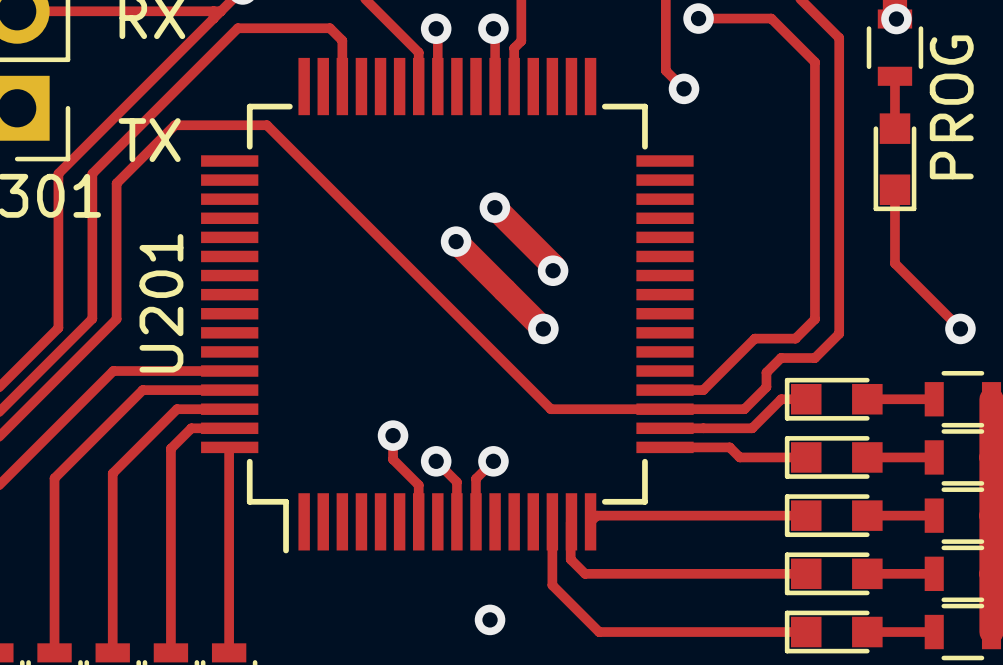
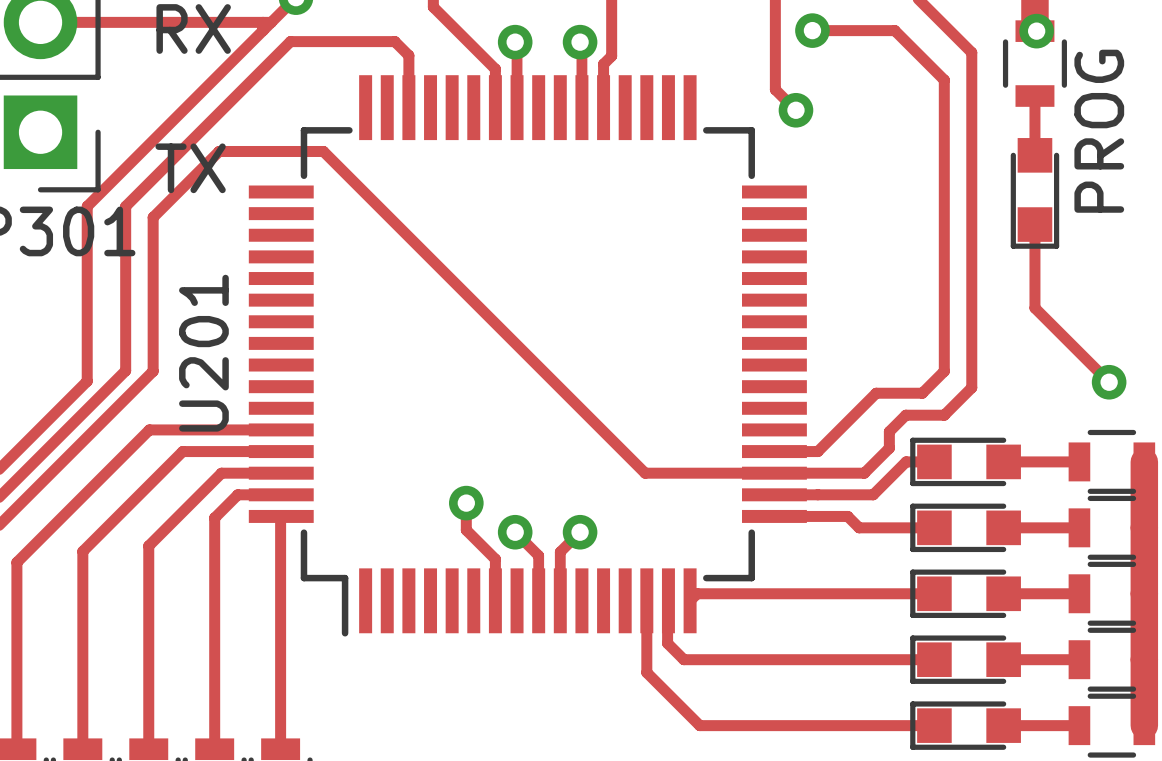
track: (494, 207) (553, 265) (553, 270) -> none
via: (494, 207) -> none
track: (456, 241) (543, 328) -> none
via: (456, 241) -> none
via: (553, 270) -> none
via: (543, 328) -> none
via: (490, 619) -> none

